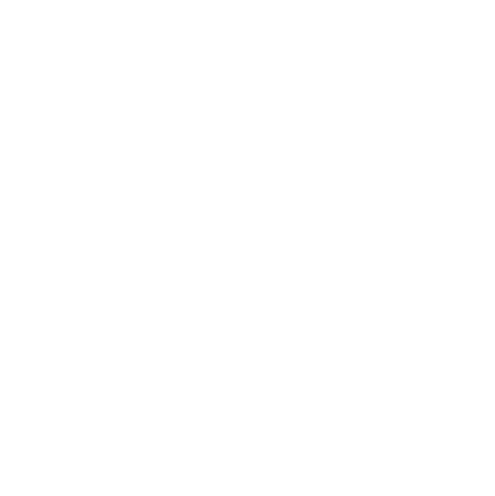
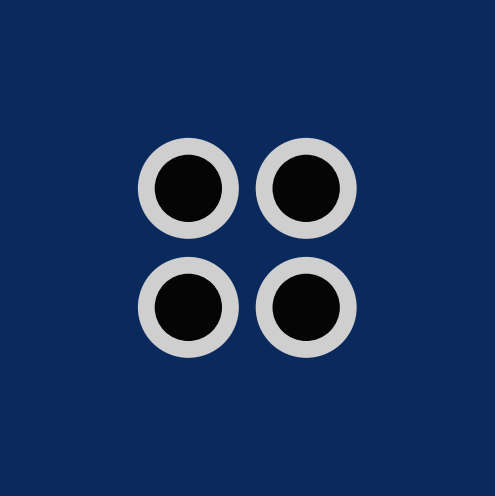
part: none -> (247, 247)

